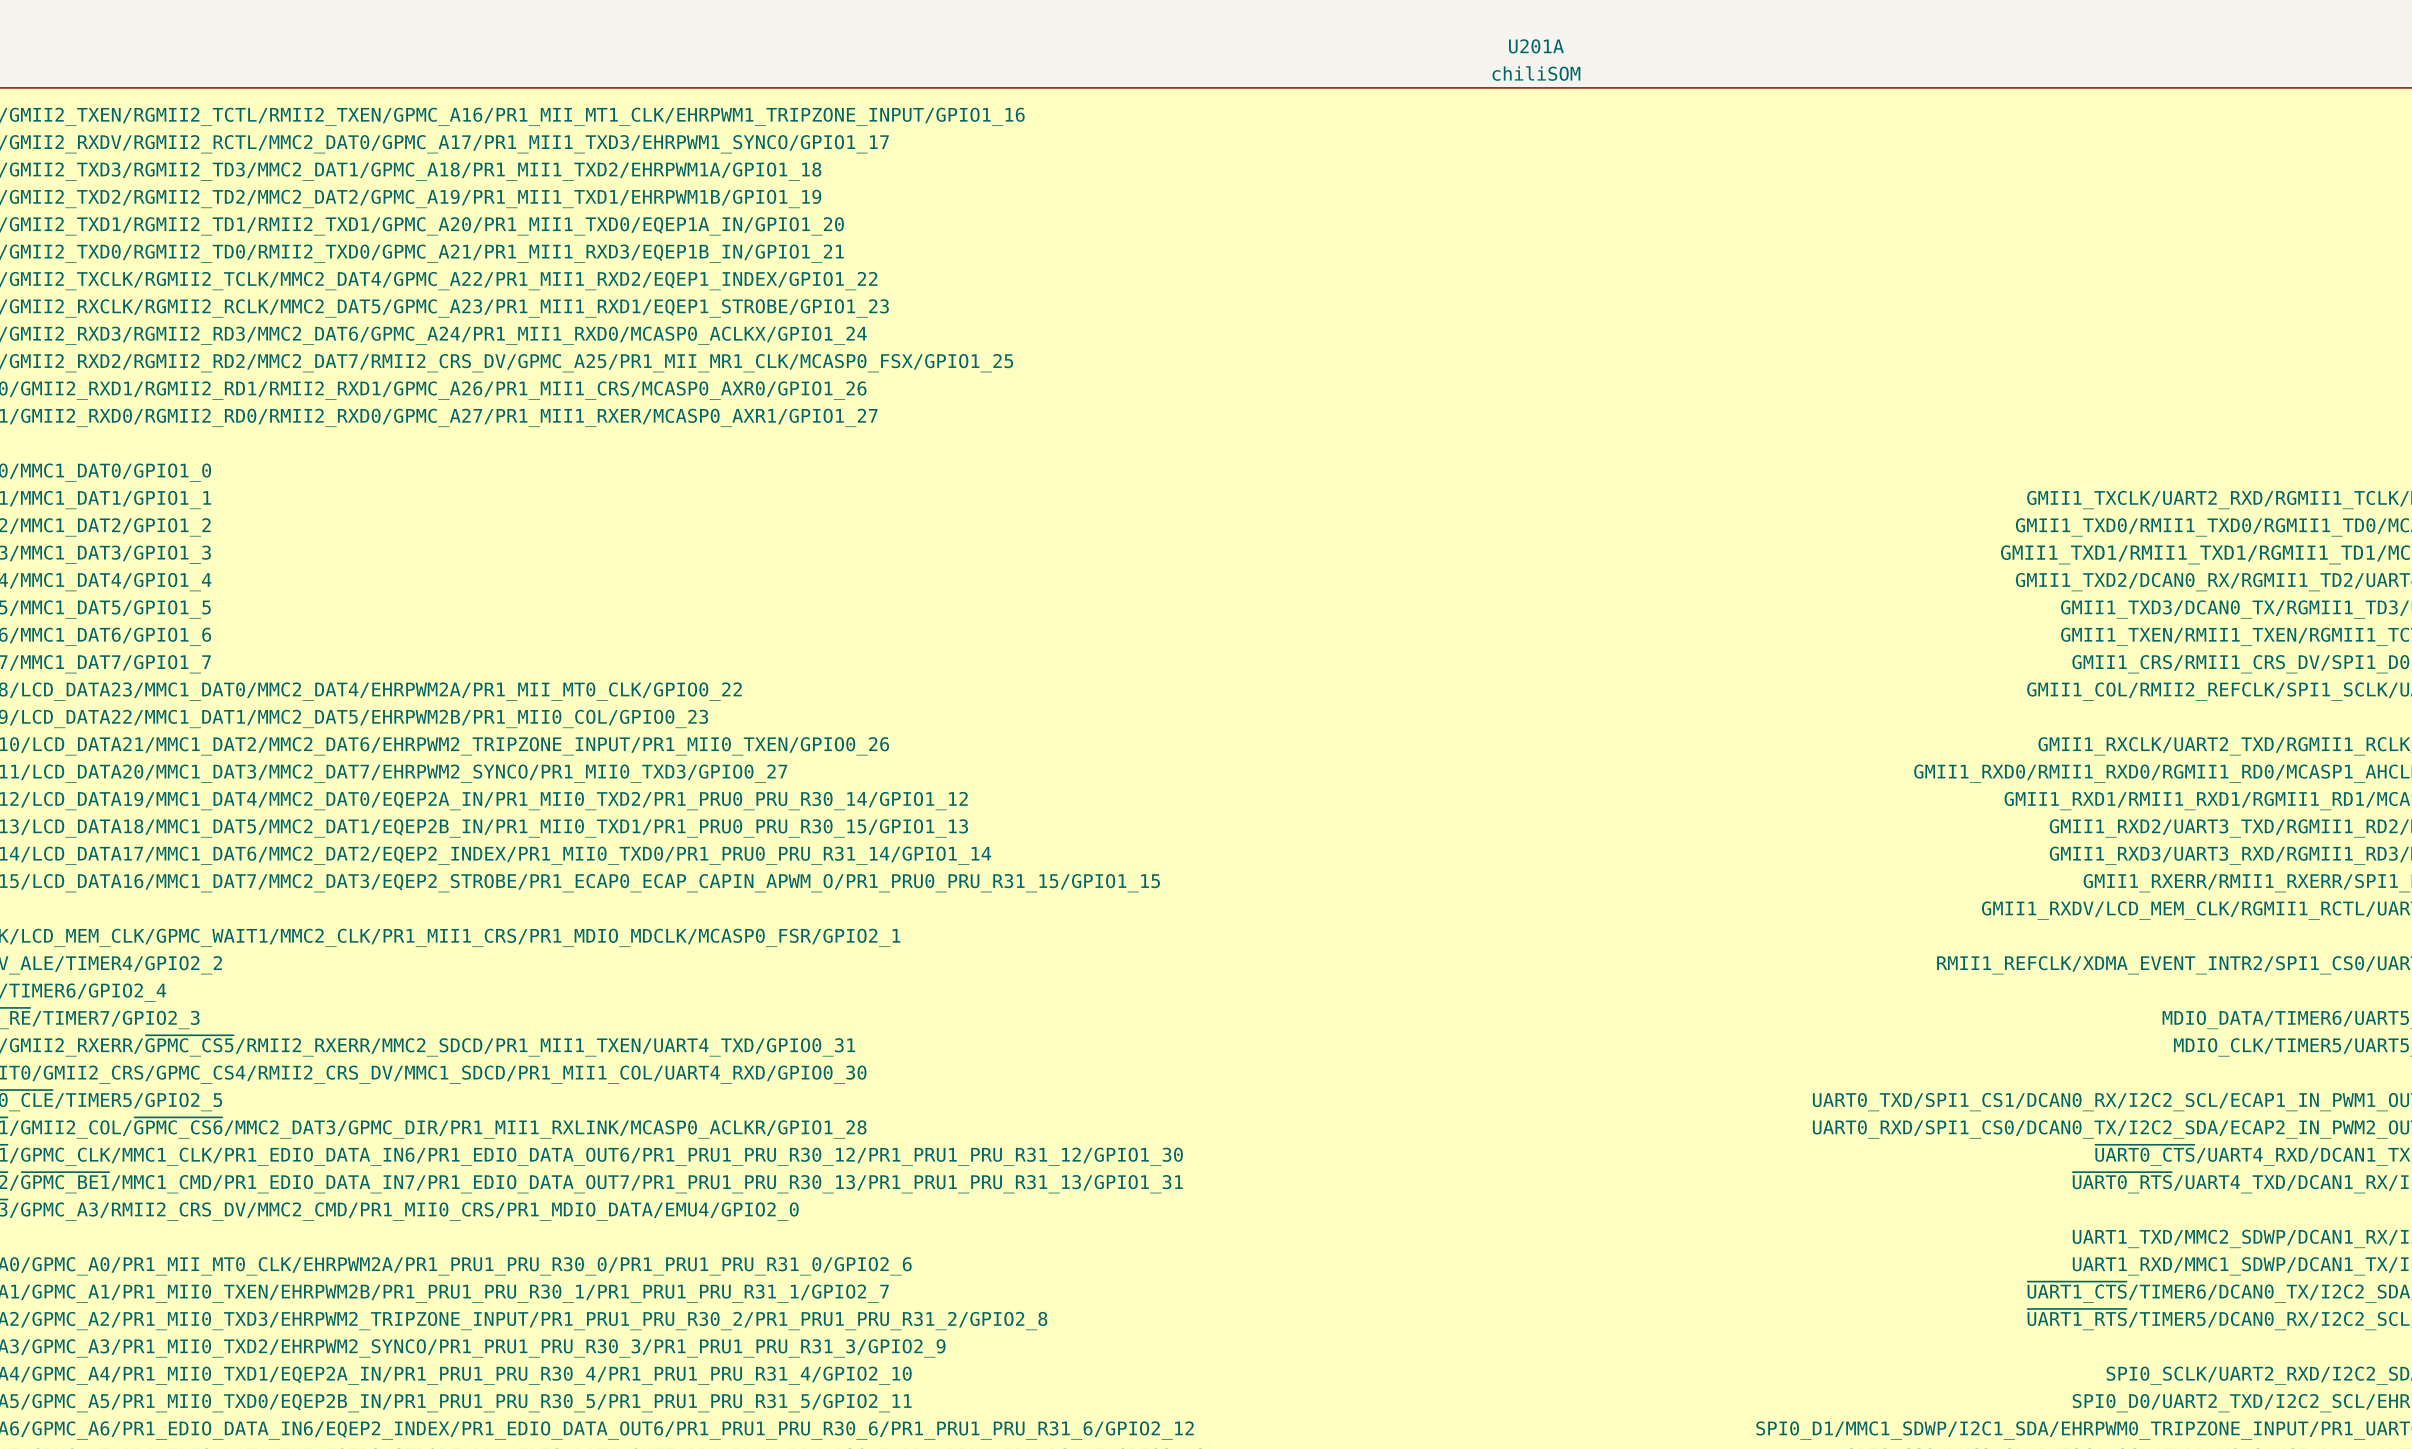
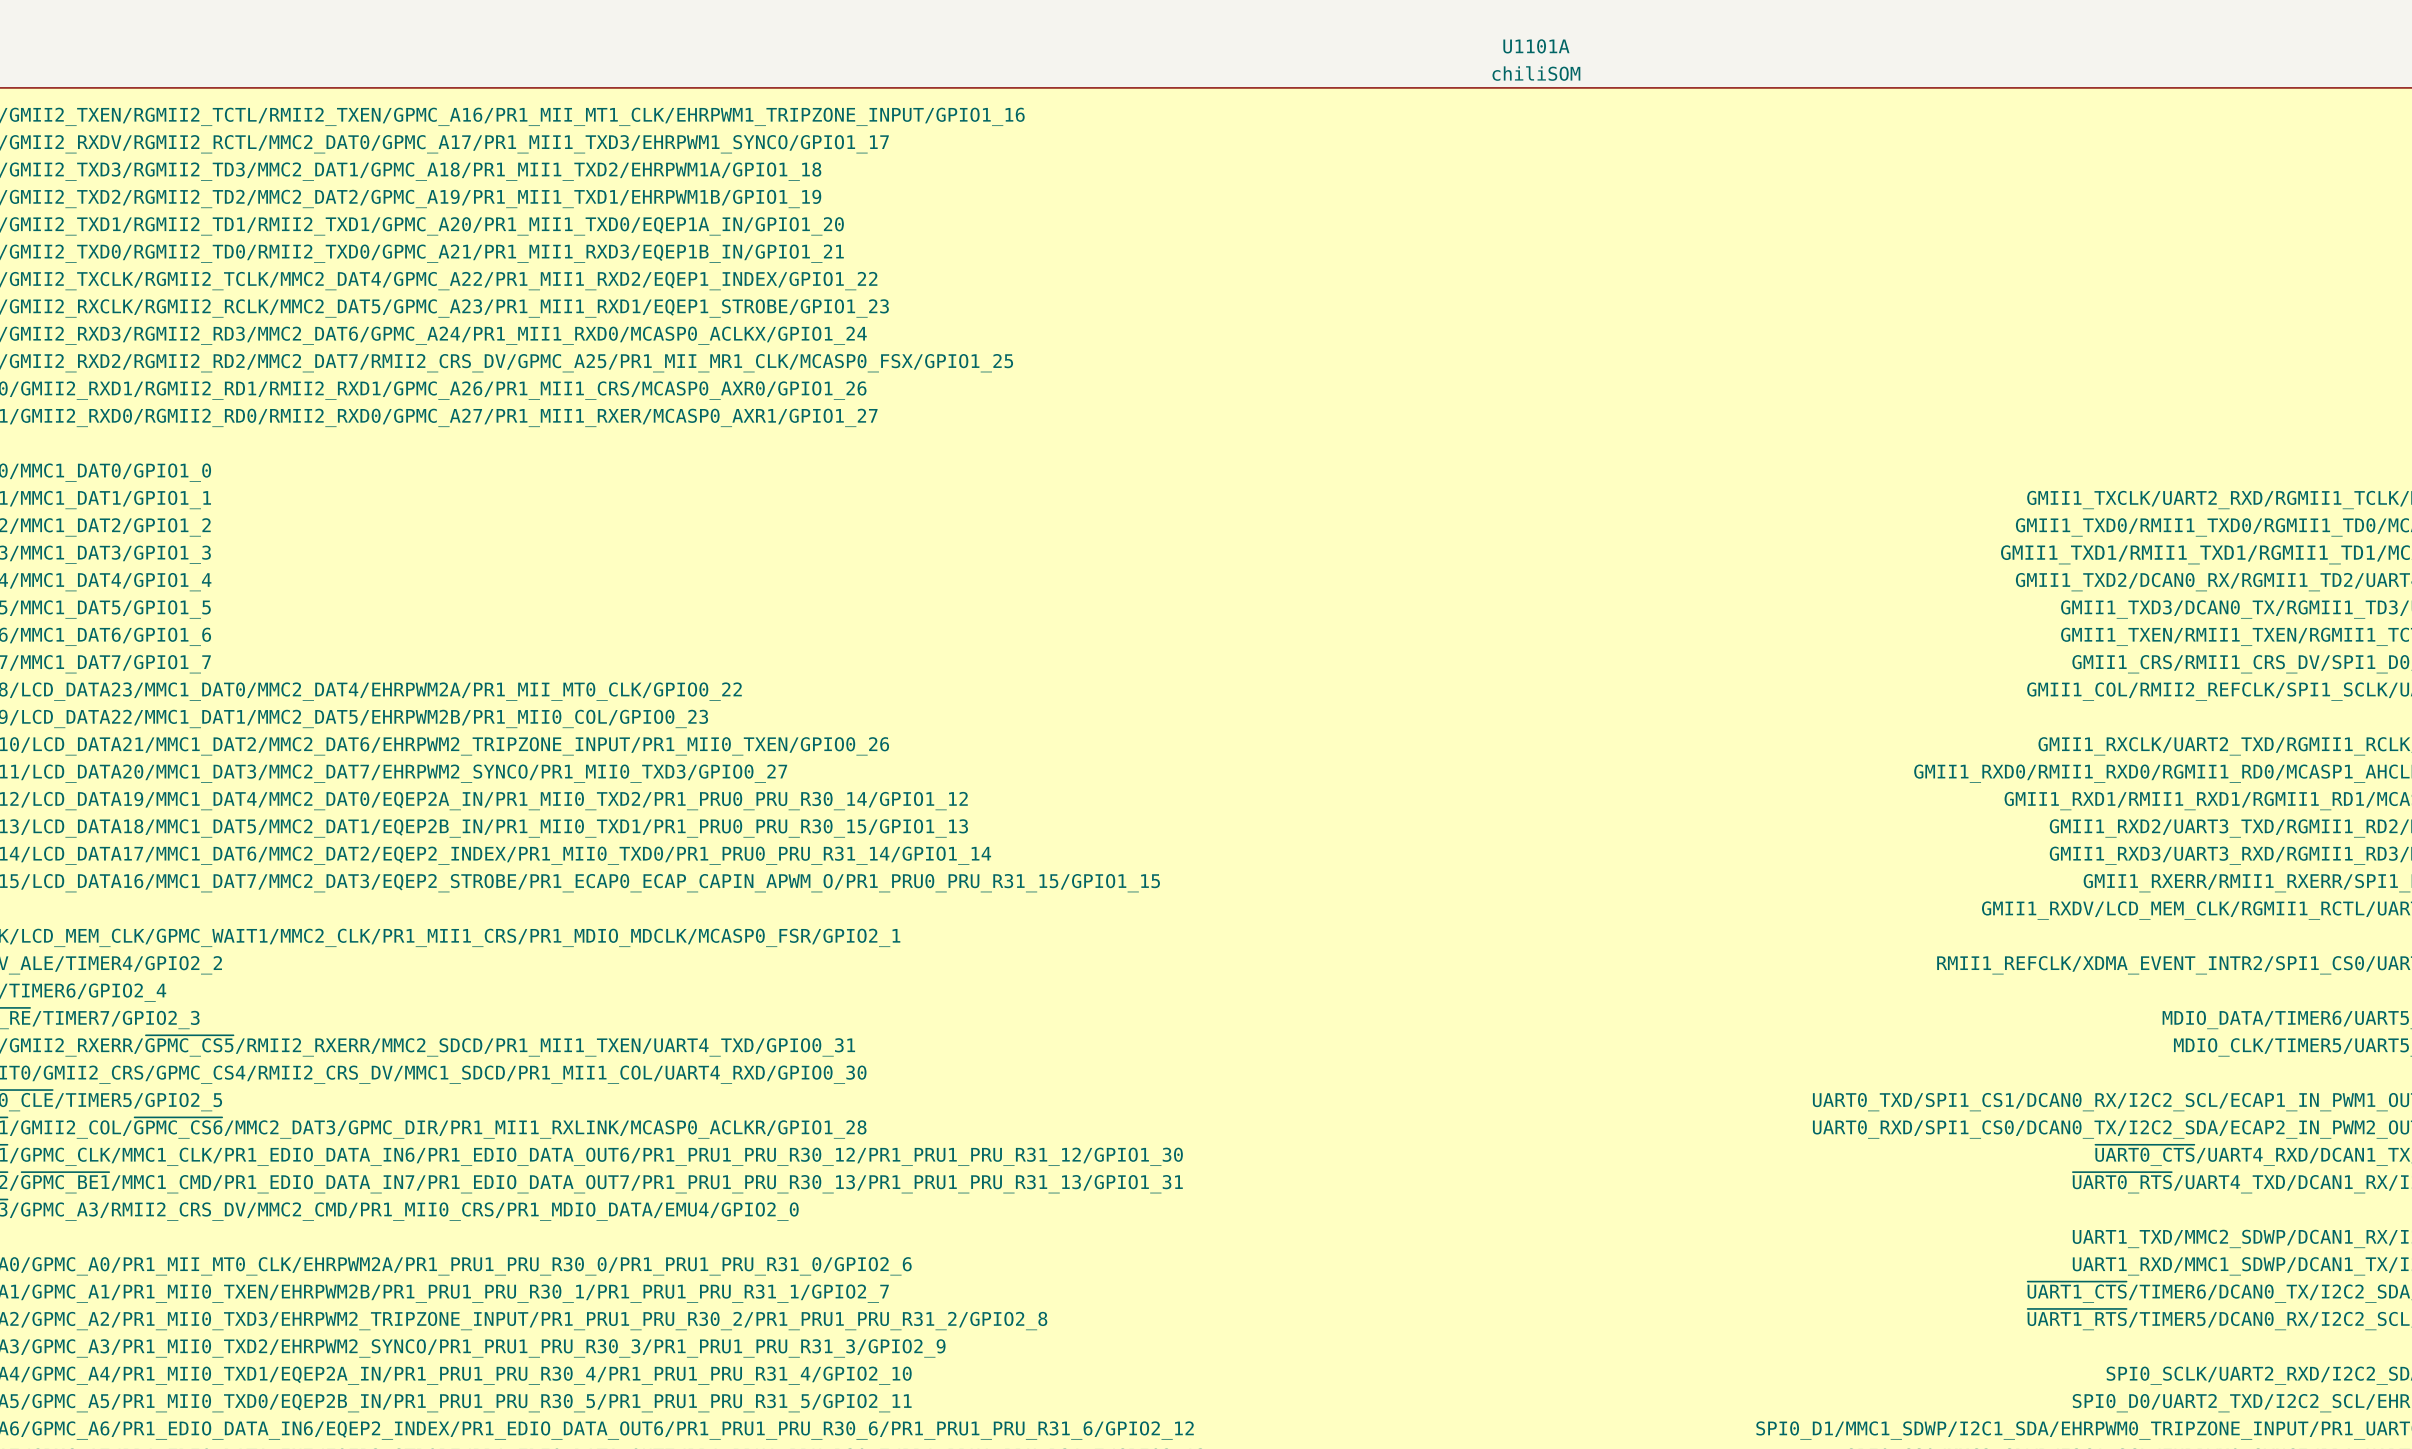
U201A name: U201A (1536, 46) -> U1101A (1536, 46)

